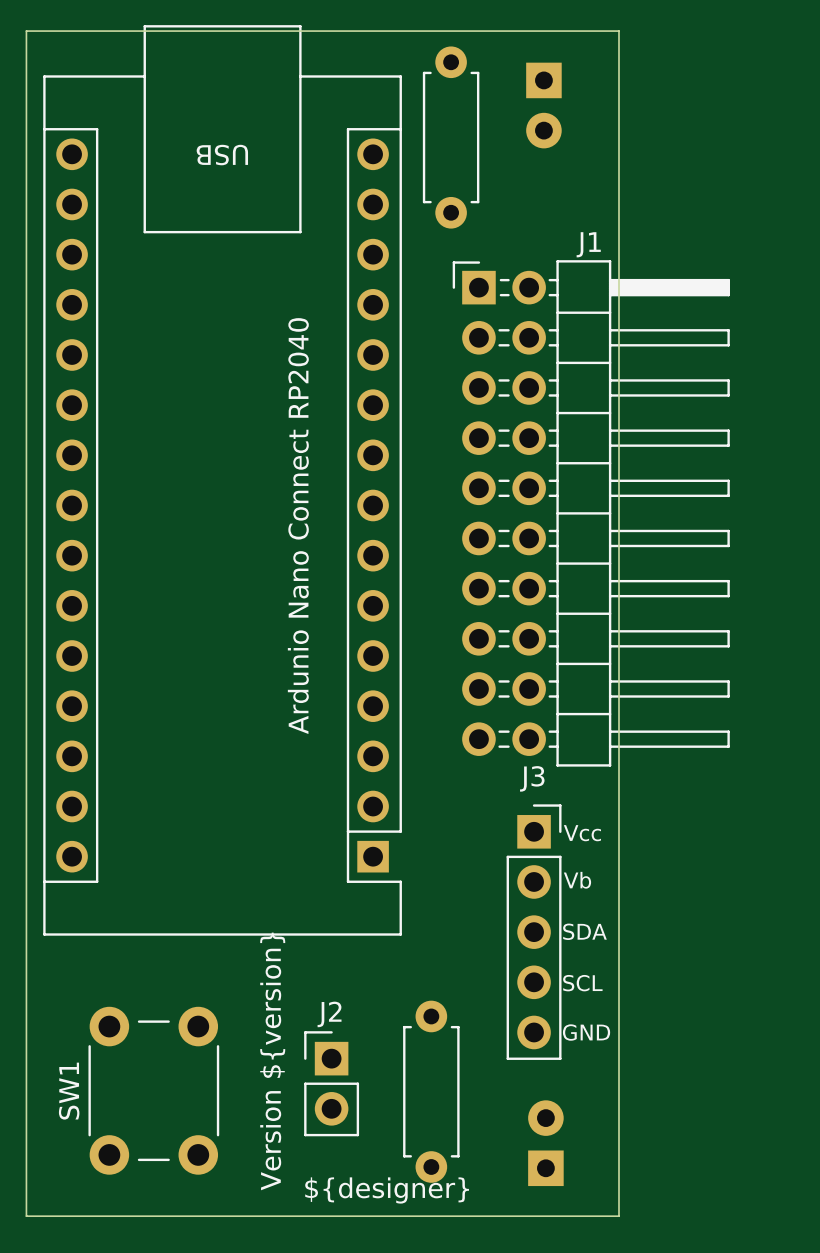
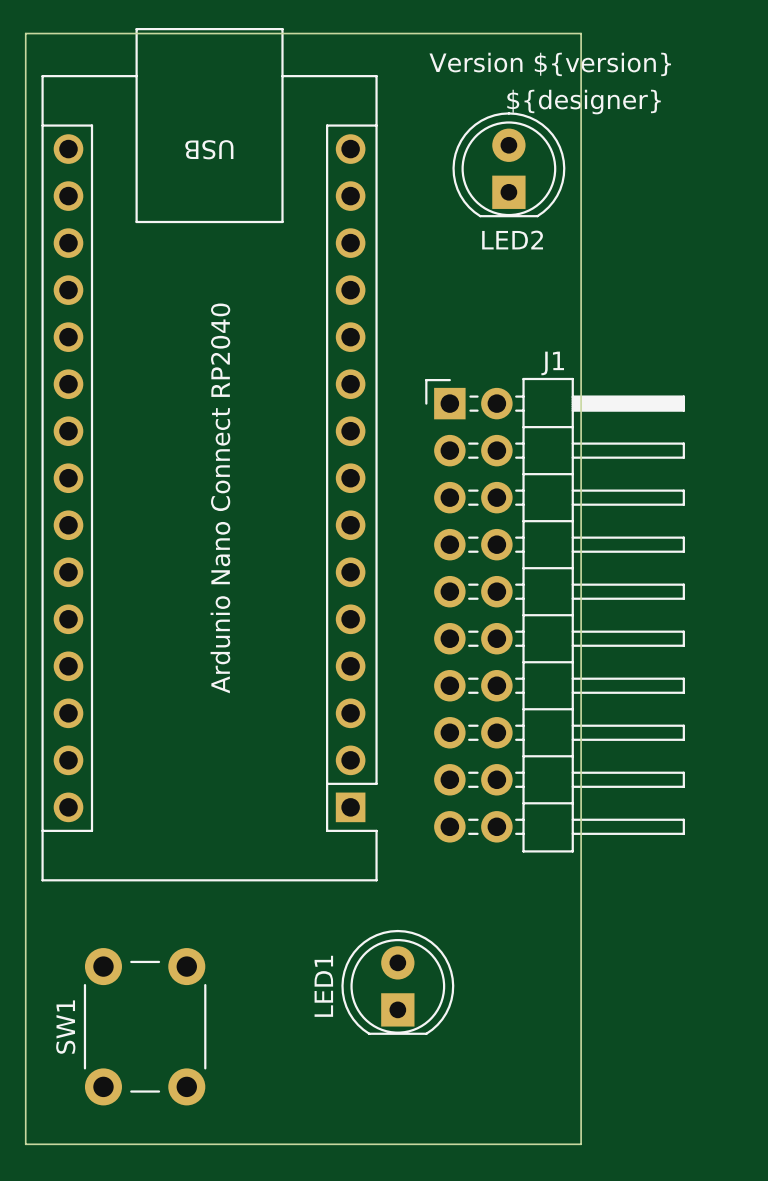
text: none -> Version ${version} (550, 64)
text: none -> ${designer} (584, 102)
LED2 side: bottom (543, 105) -> top (508, 164)
part: (451, 137) -> none
J1 position: (591, 513) -> (555, 615)
text position: Ardunio Nano Connect RP2040 (298, 526) -> Ardunio Nano Connect RP2040 (220, 498)
text: Vcc (582, 833) -> none
text: Vb (577, 880) -> none
text: SDA (584, 931) -> none
J3: (534, 932) -> none
text: SCL (582, 983) -> none
text: GND (586, 1032) -> none
text: Version ${version} (272, 1061) -> none
J2: (331, 1083) -> none
part: (431, 1091) -> none
LED1 side: bottom (545, 1143) -> top (397, 982)
text: ${designer} (387, 1190) -> none

